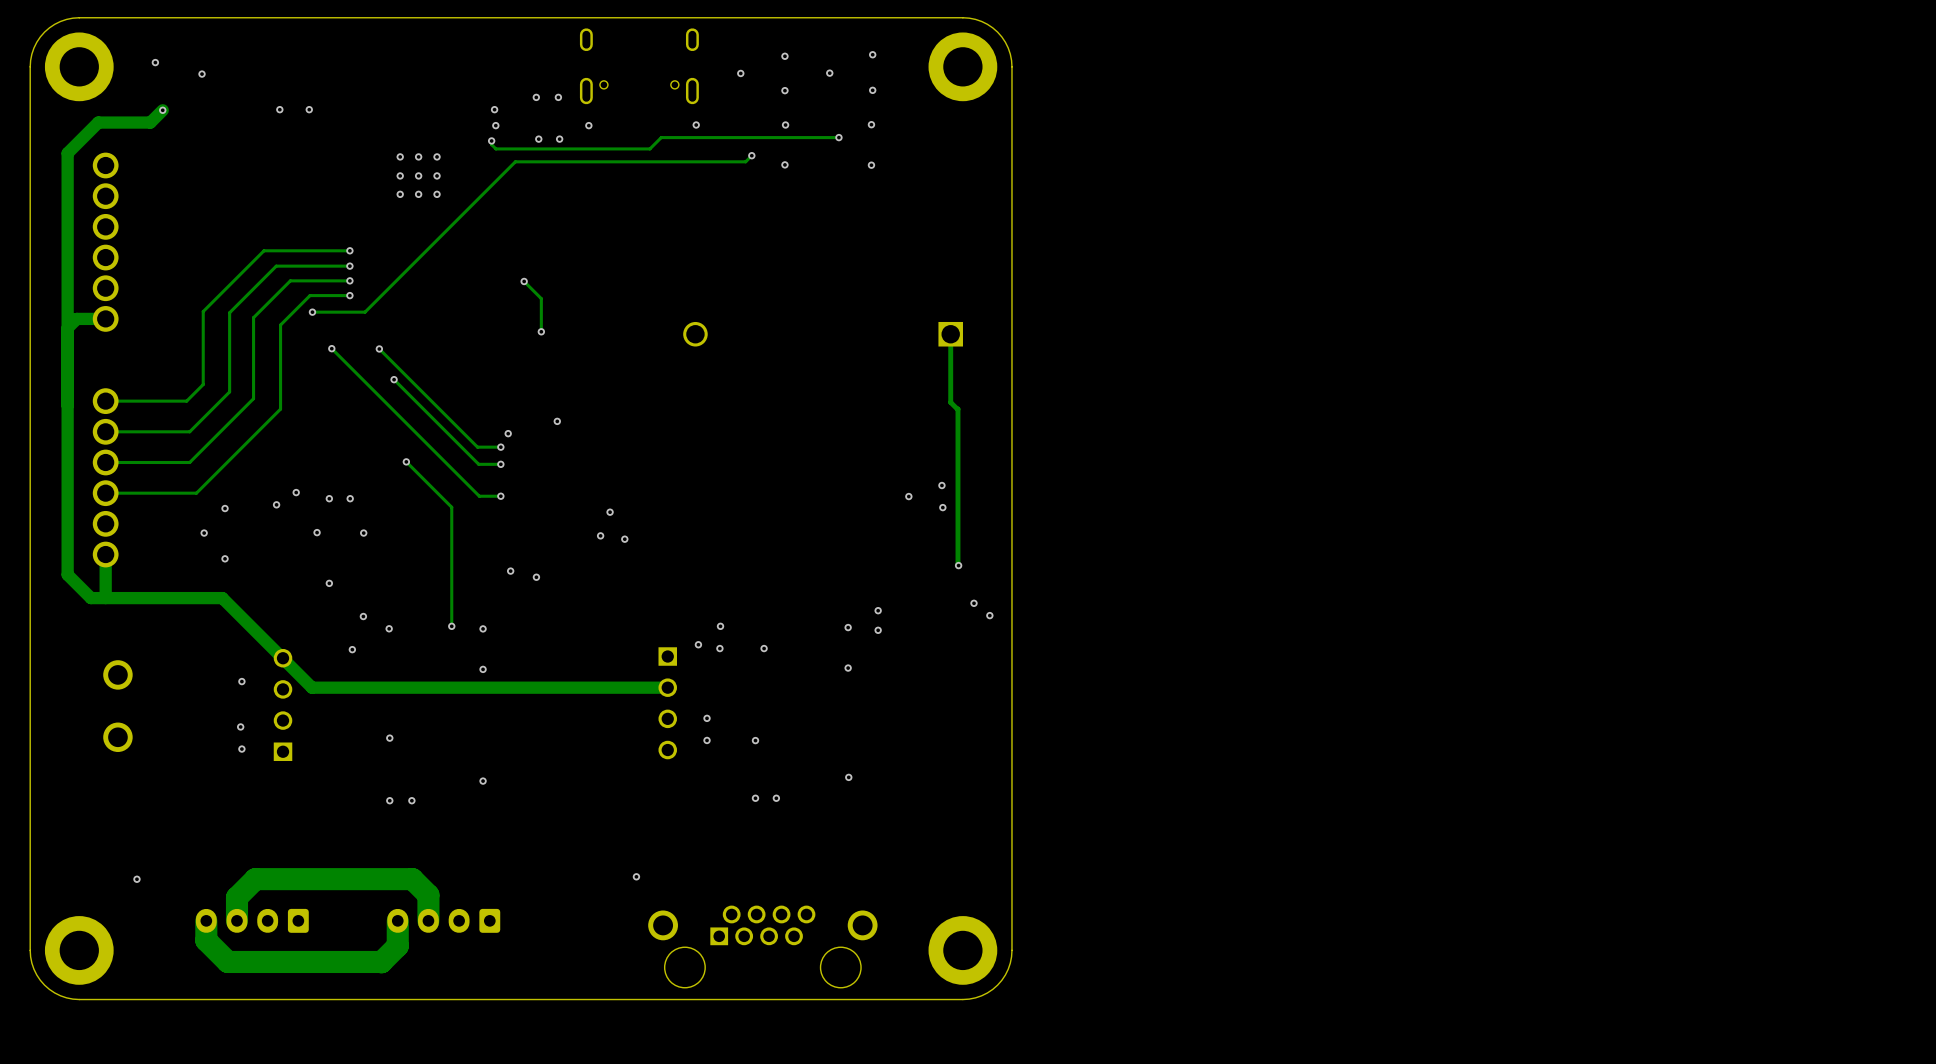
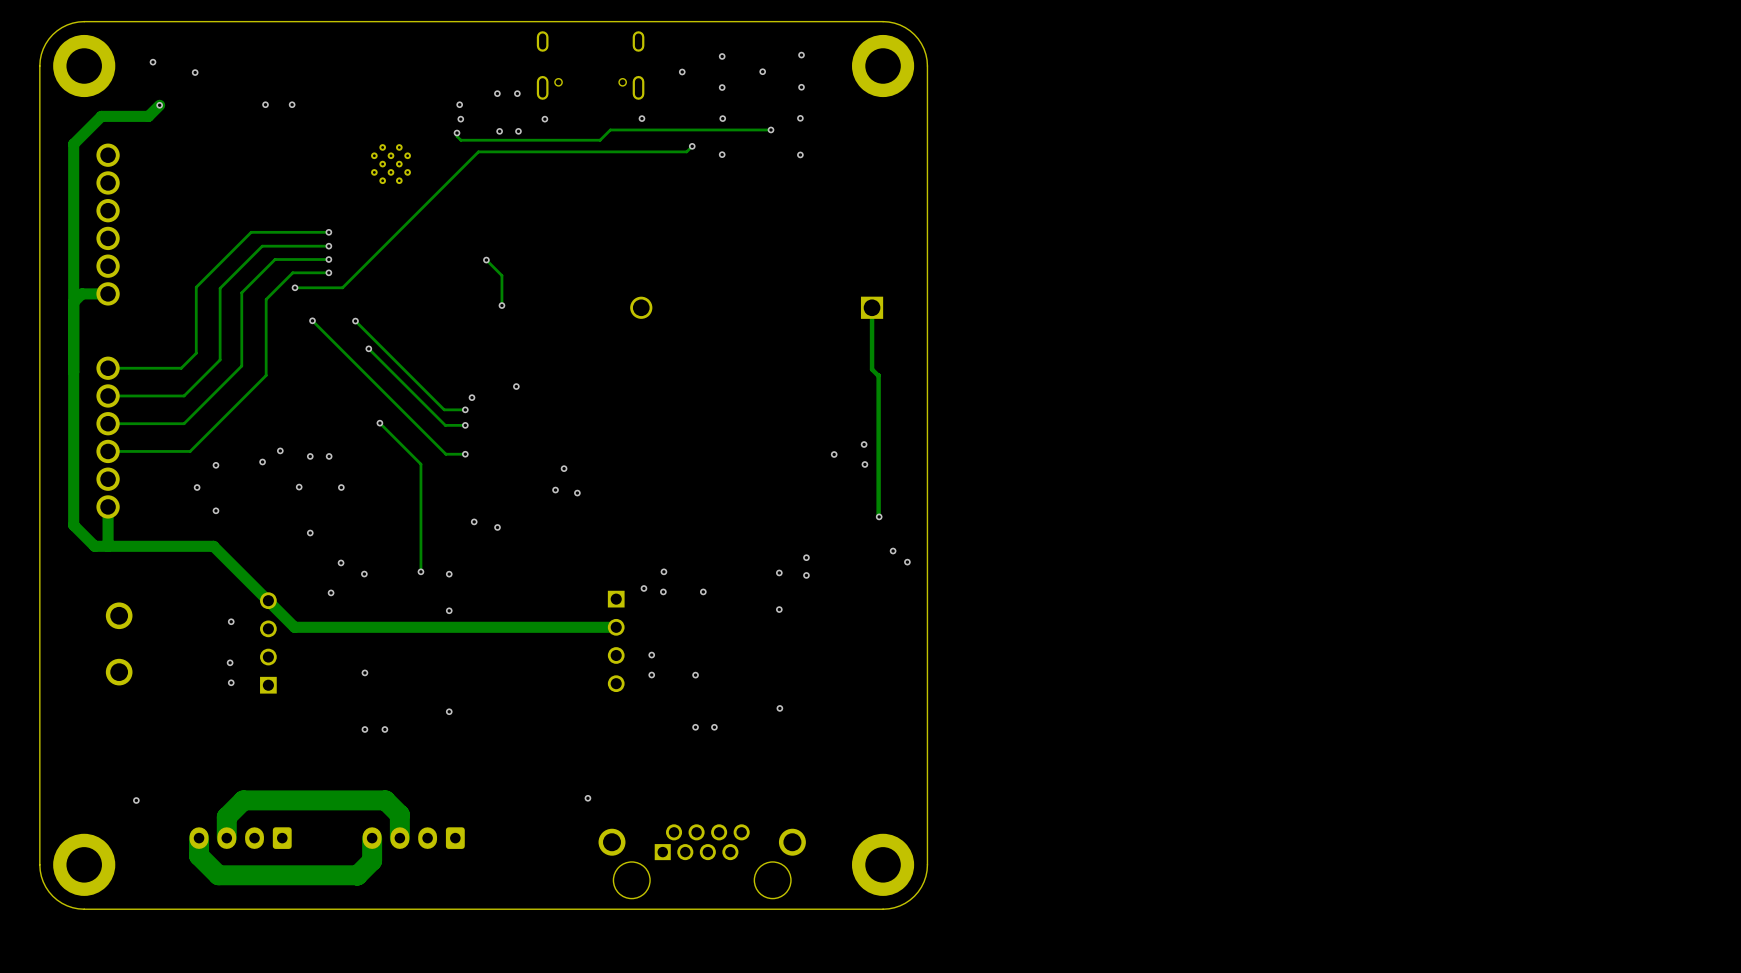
via: (400, 156) -> none
via: (418, 156) -> none
via: (437, 156) -> none
via: (400, 175) -> none
via: (418, 175) -> none
part: none -> (390, 164)
via: (437, 175) -> none
via: (400, 194) -> none
via: (418, 194) -> none
via: (437, 194) -> none

